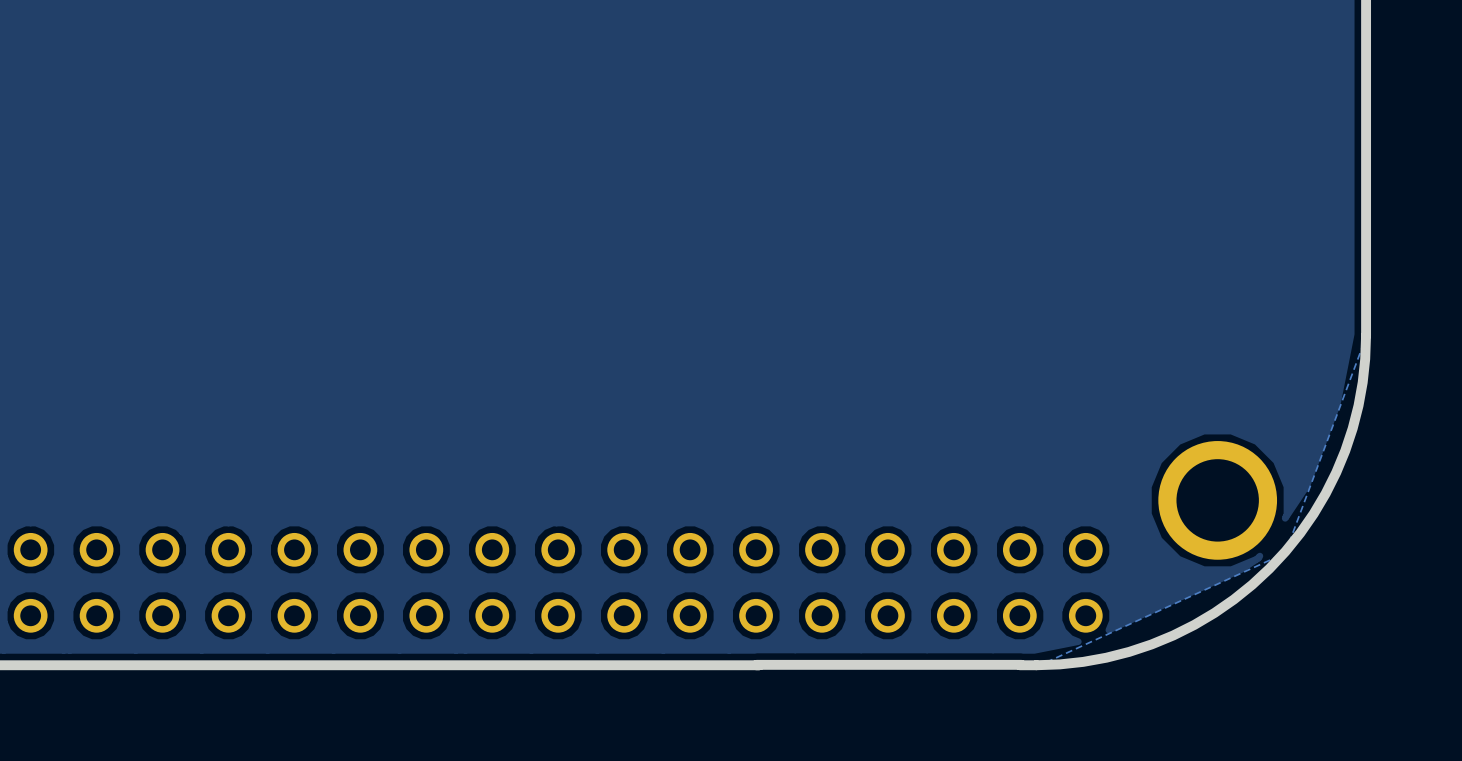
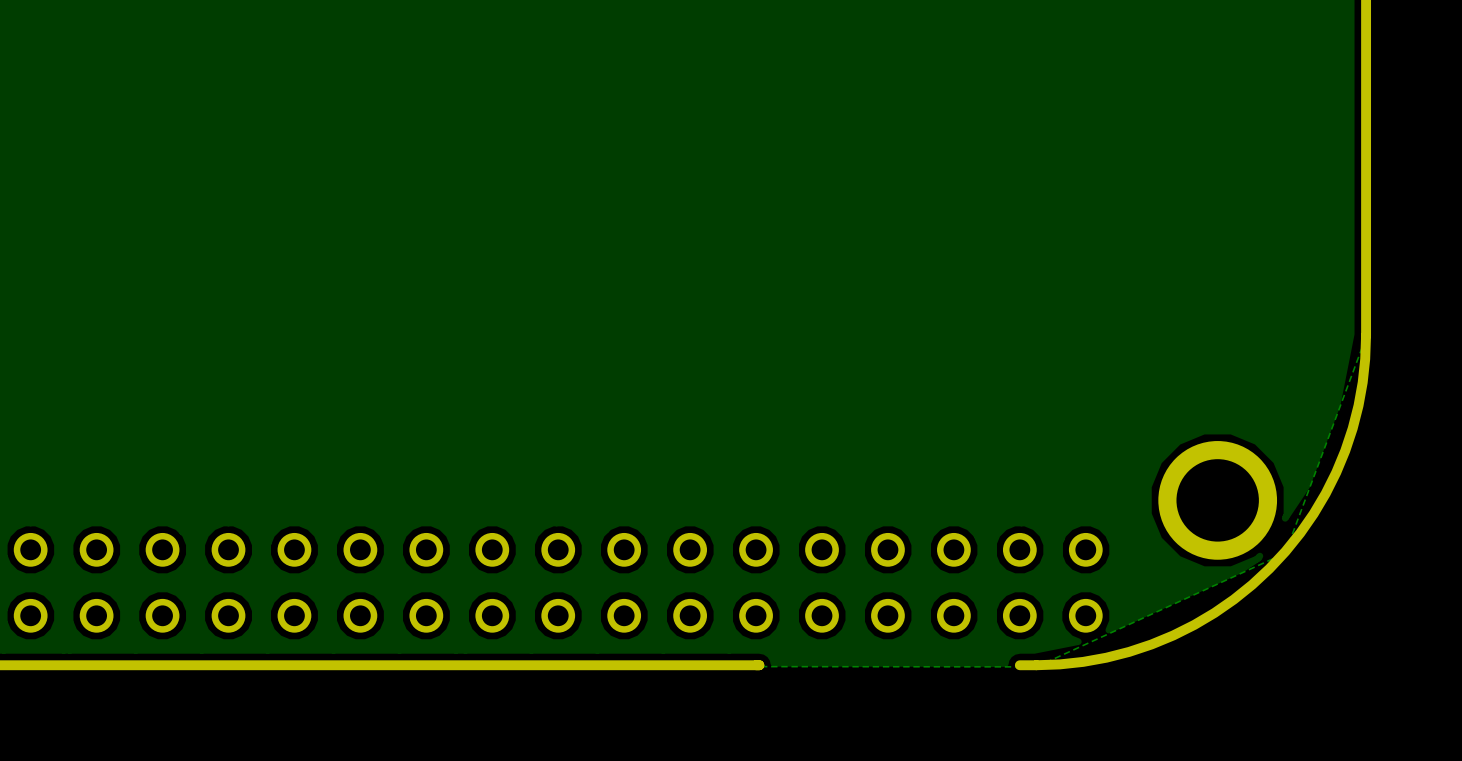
board edge: (1021, 664) (756, 664) -> none

